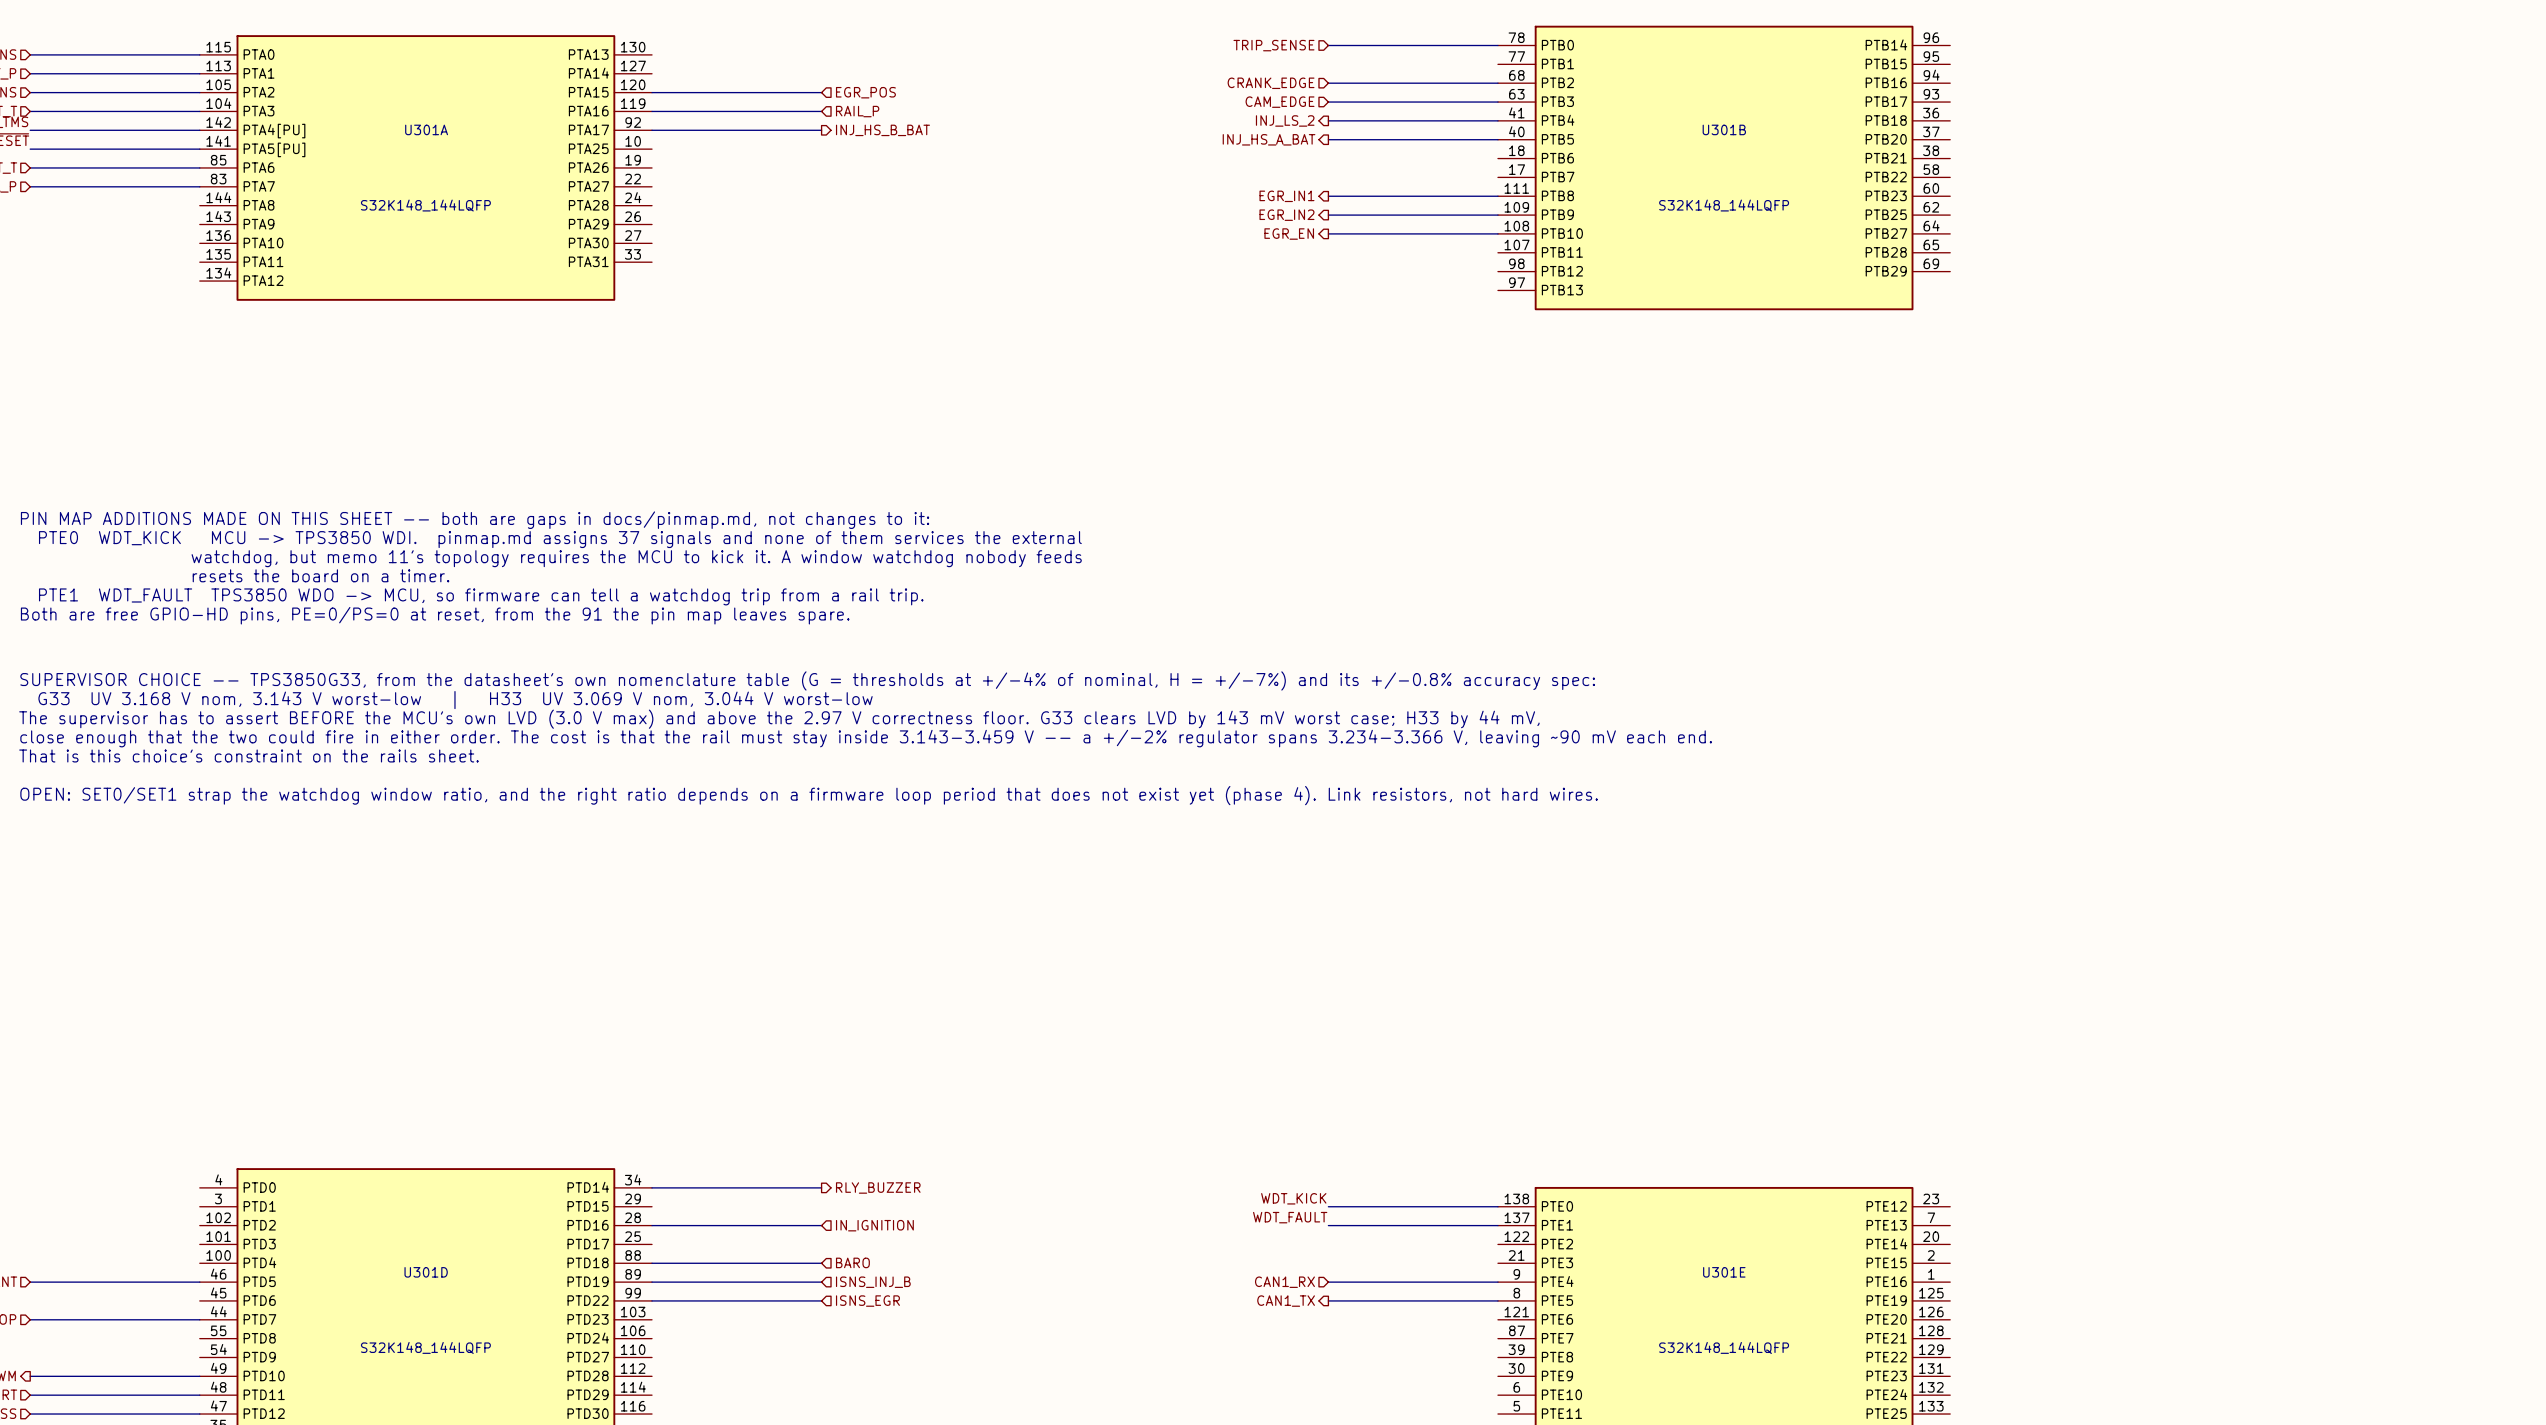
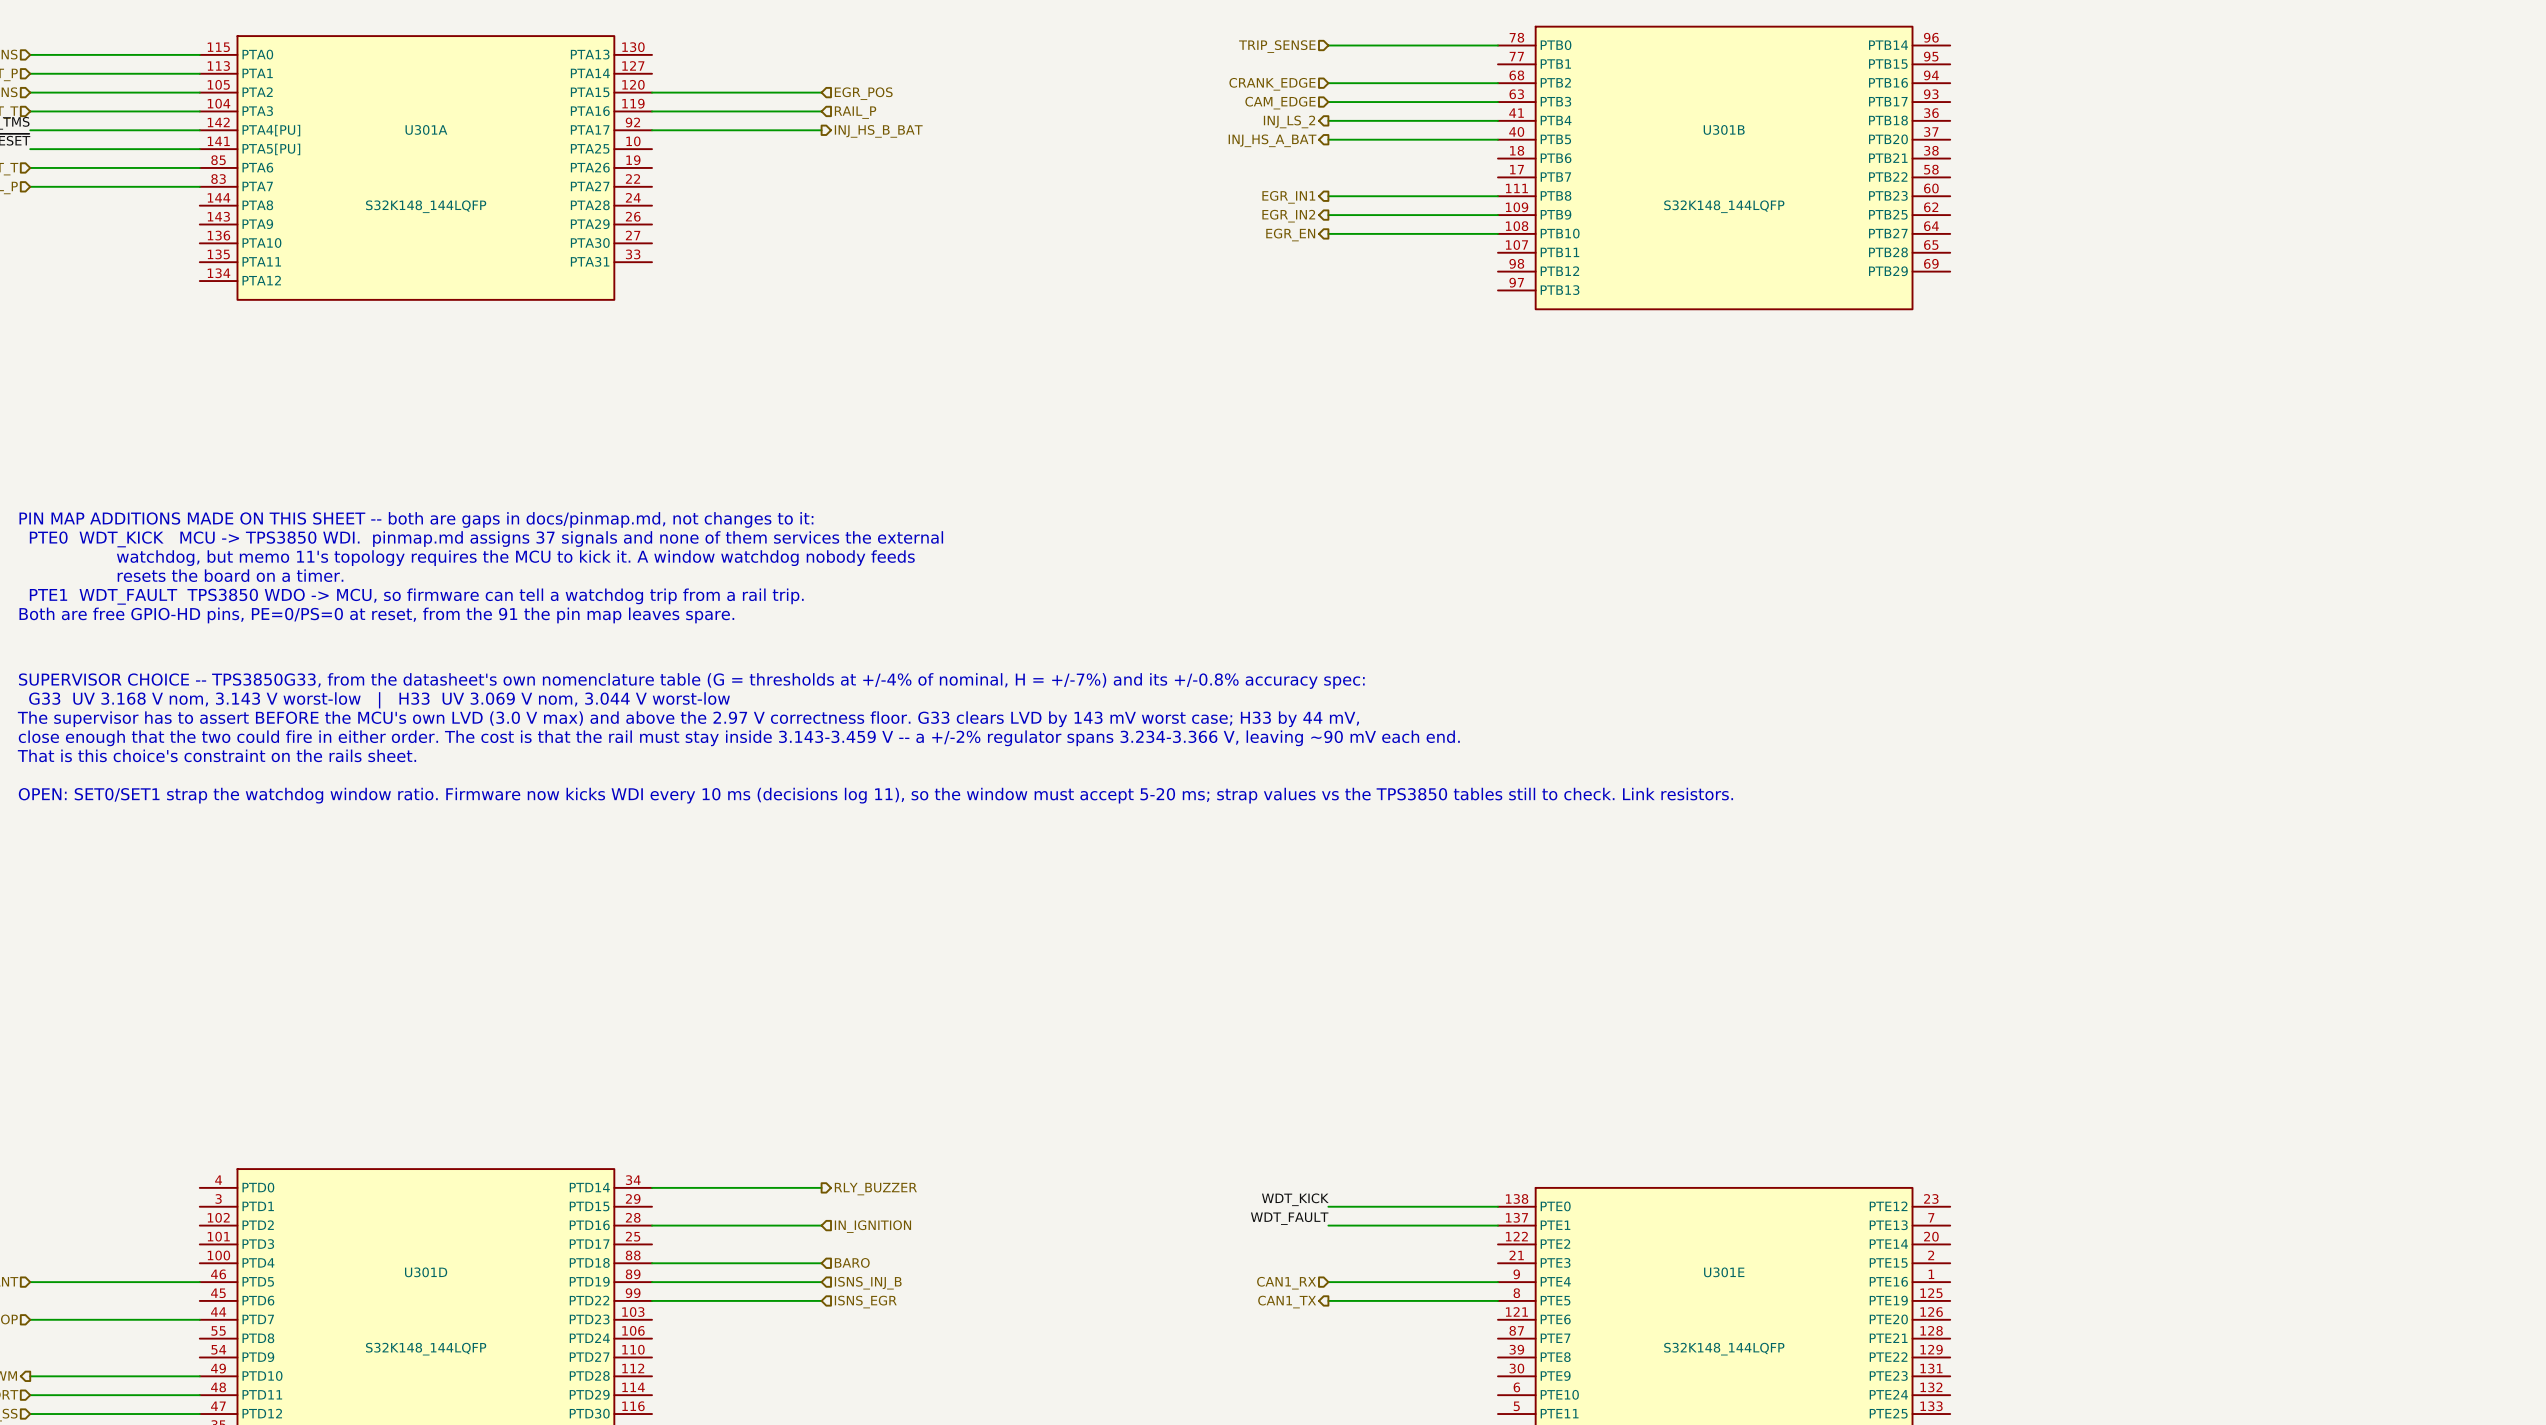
text: OPEN: SET0/SET1 strap the watchdog window ratio, and the right ratio depends on a firmware loop period that does not exist yet (phase 4). Link resistors, not hard wires. (809, 795) -> OPEN: SET0/SET1 strap the watchdog window ratio. Firmware now kicks WDI every 10 ms (decisions log 11), so the window must accept 5-20 ms; strap values vs the TPS3850 tables still to check. Link resistors. (875, 795)

